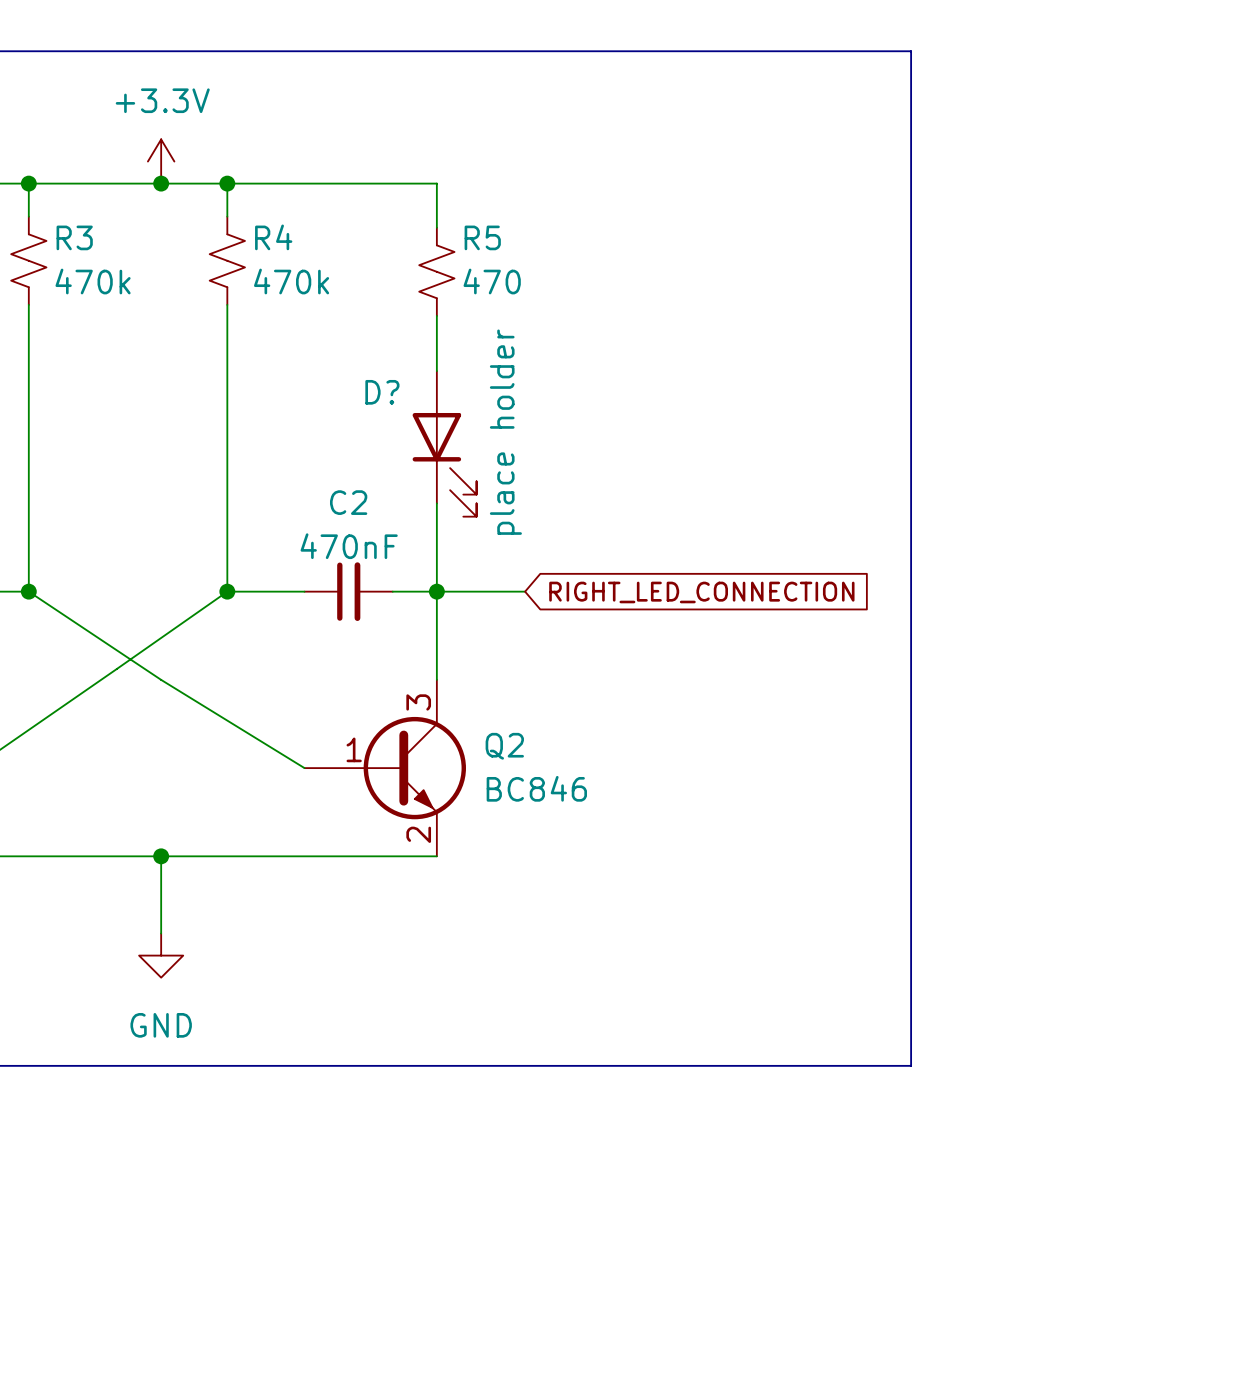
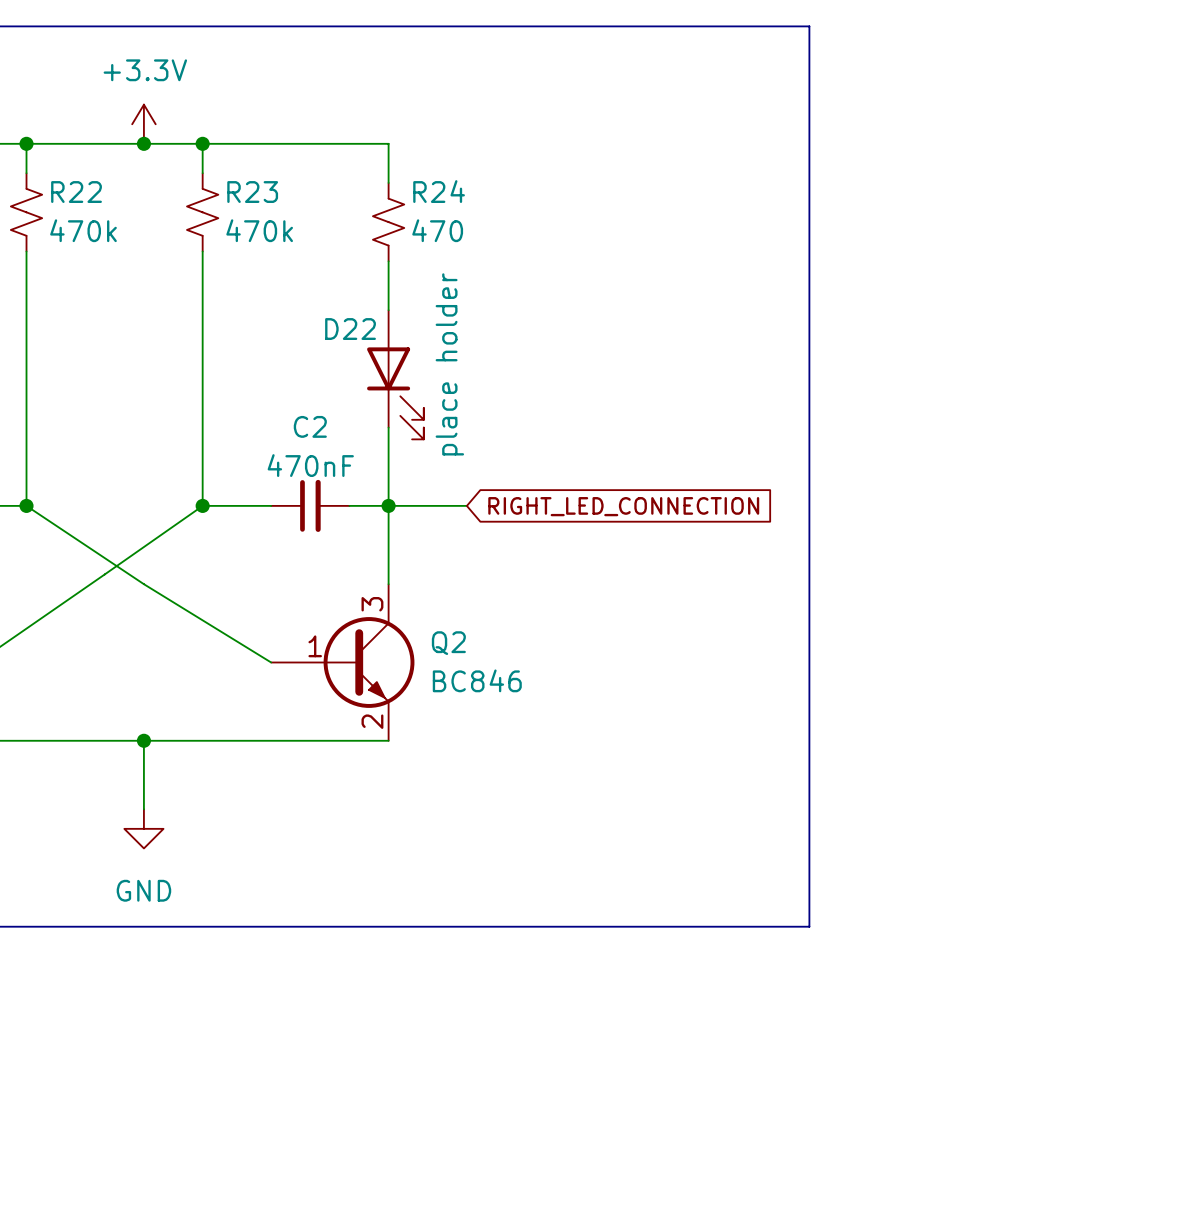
R3 name: R3 (74, 237) -> R22 (76, 192)
R4 name: R4 (273, 237) -> R23 (252, 192)
R5 name: R5 (482, 237) -> R24 (439, 191)
D? name: D? (382, 392) -> D22 (350, 329)

